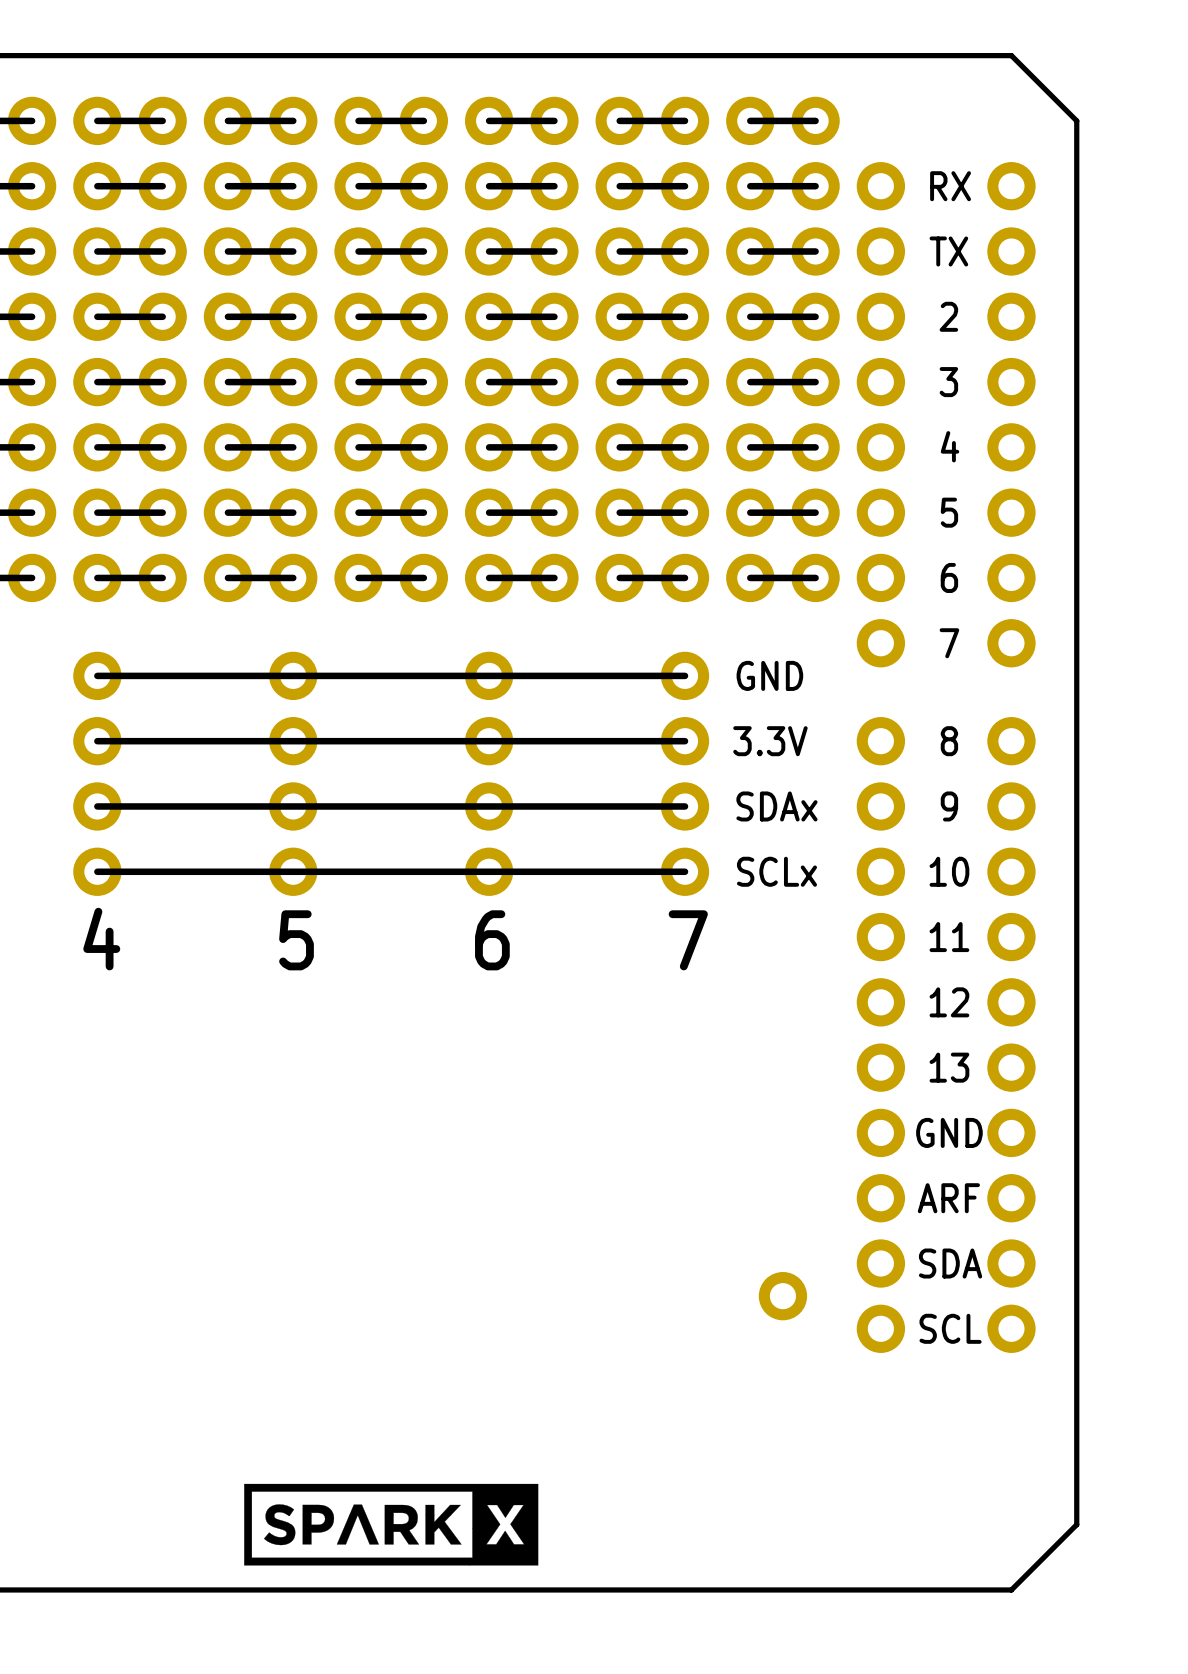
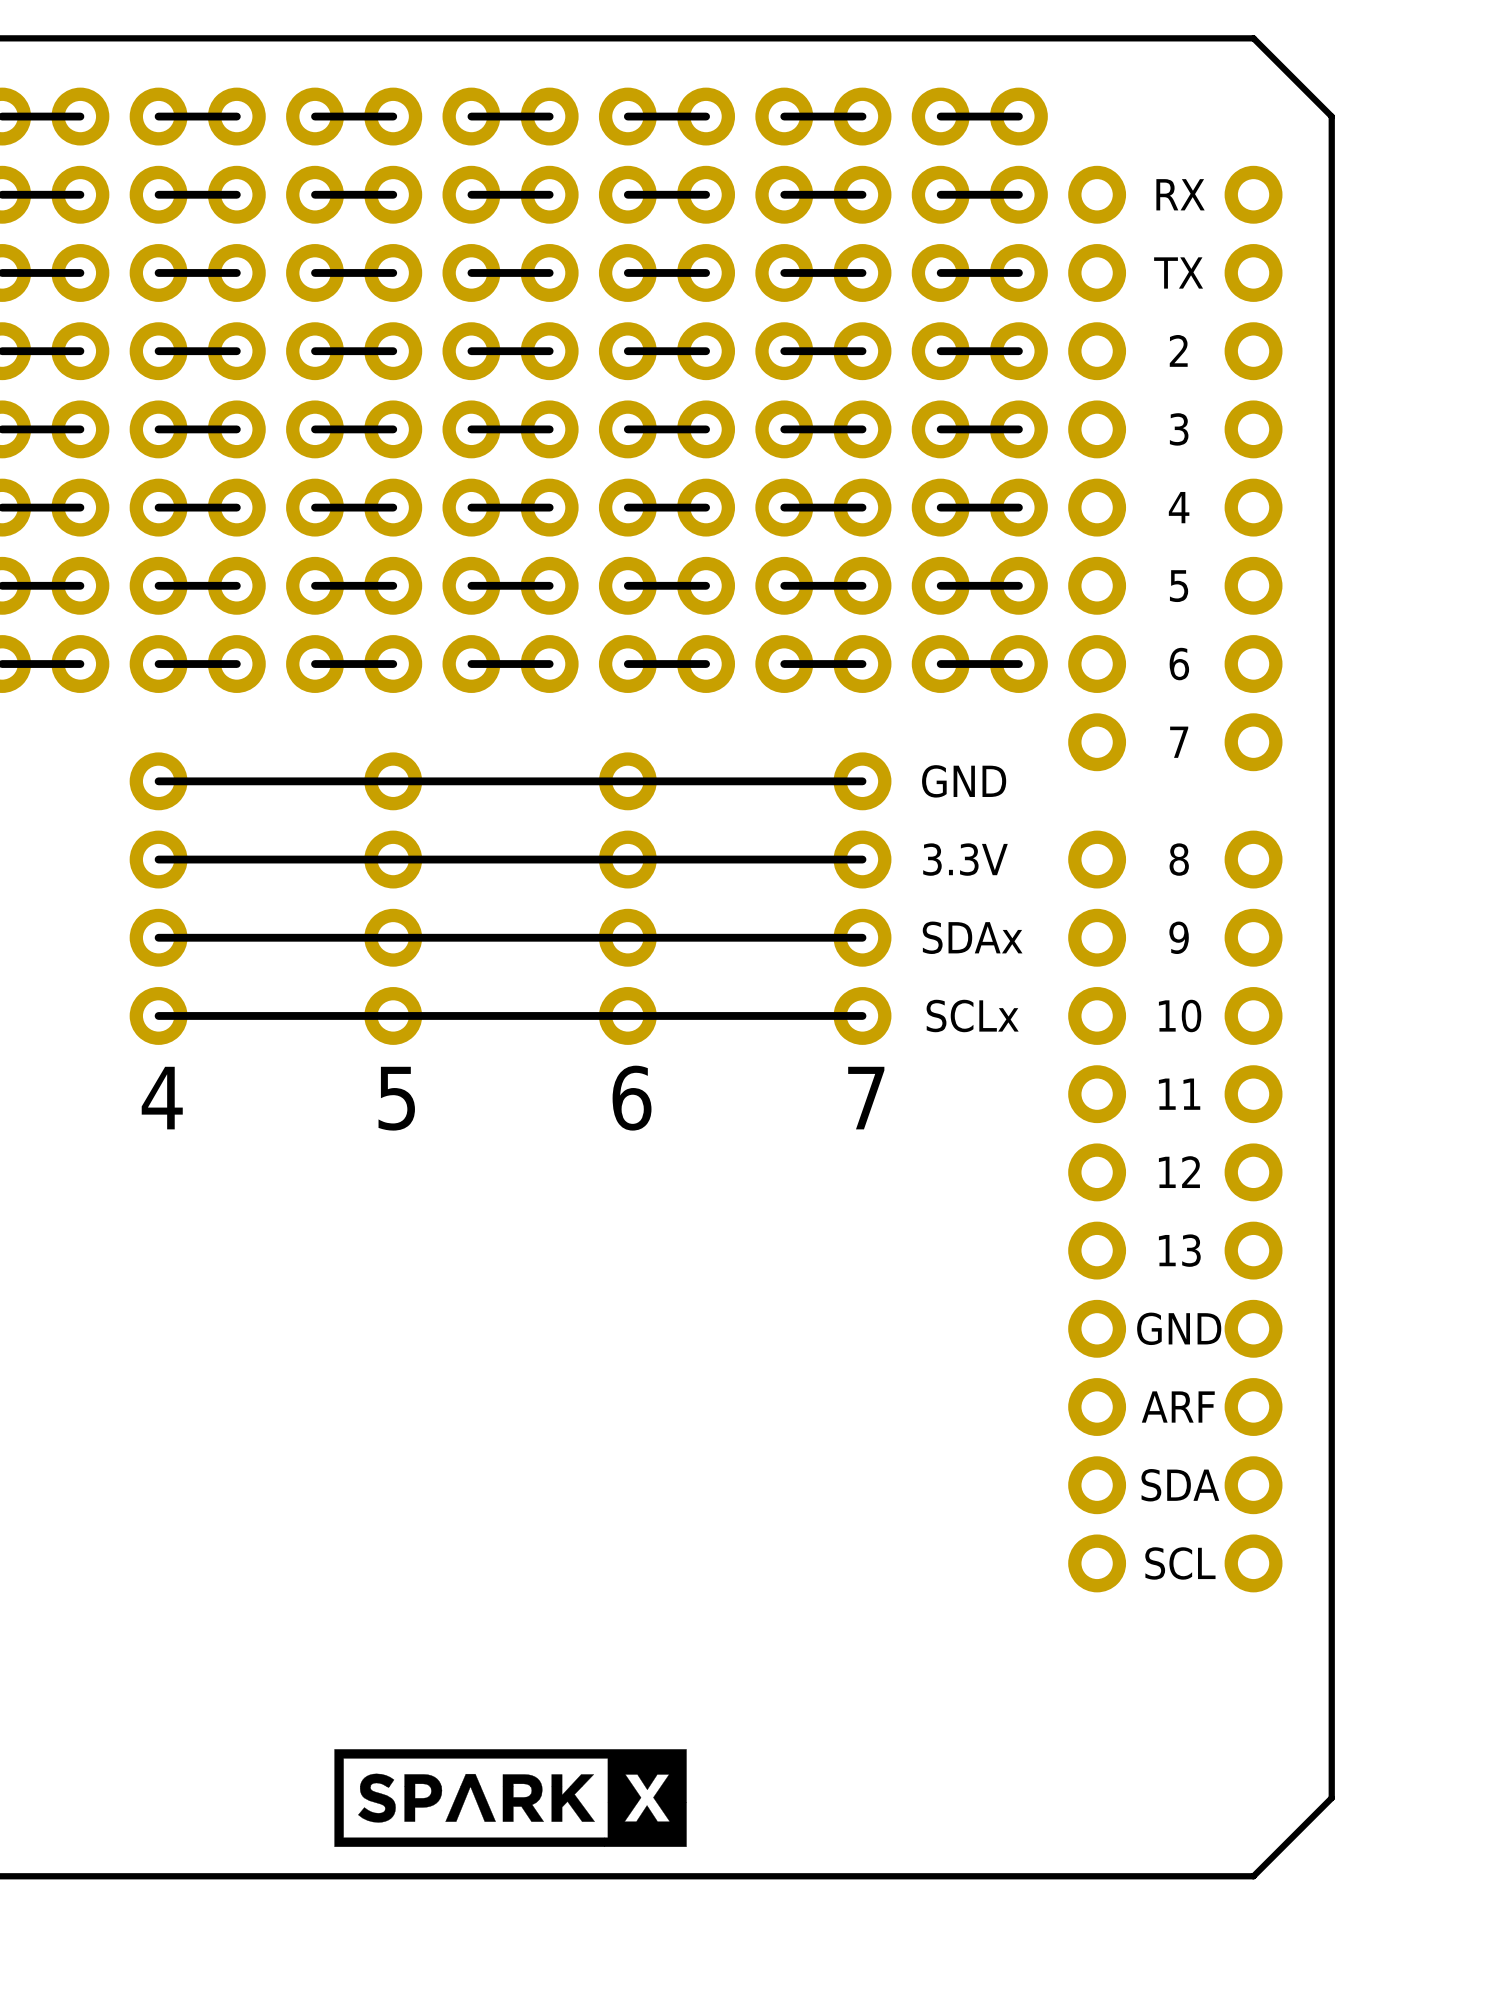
part: (782, 1296) -> none

